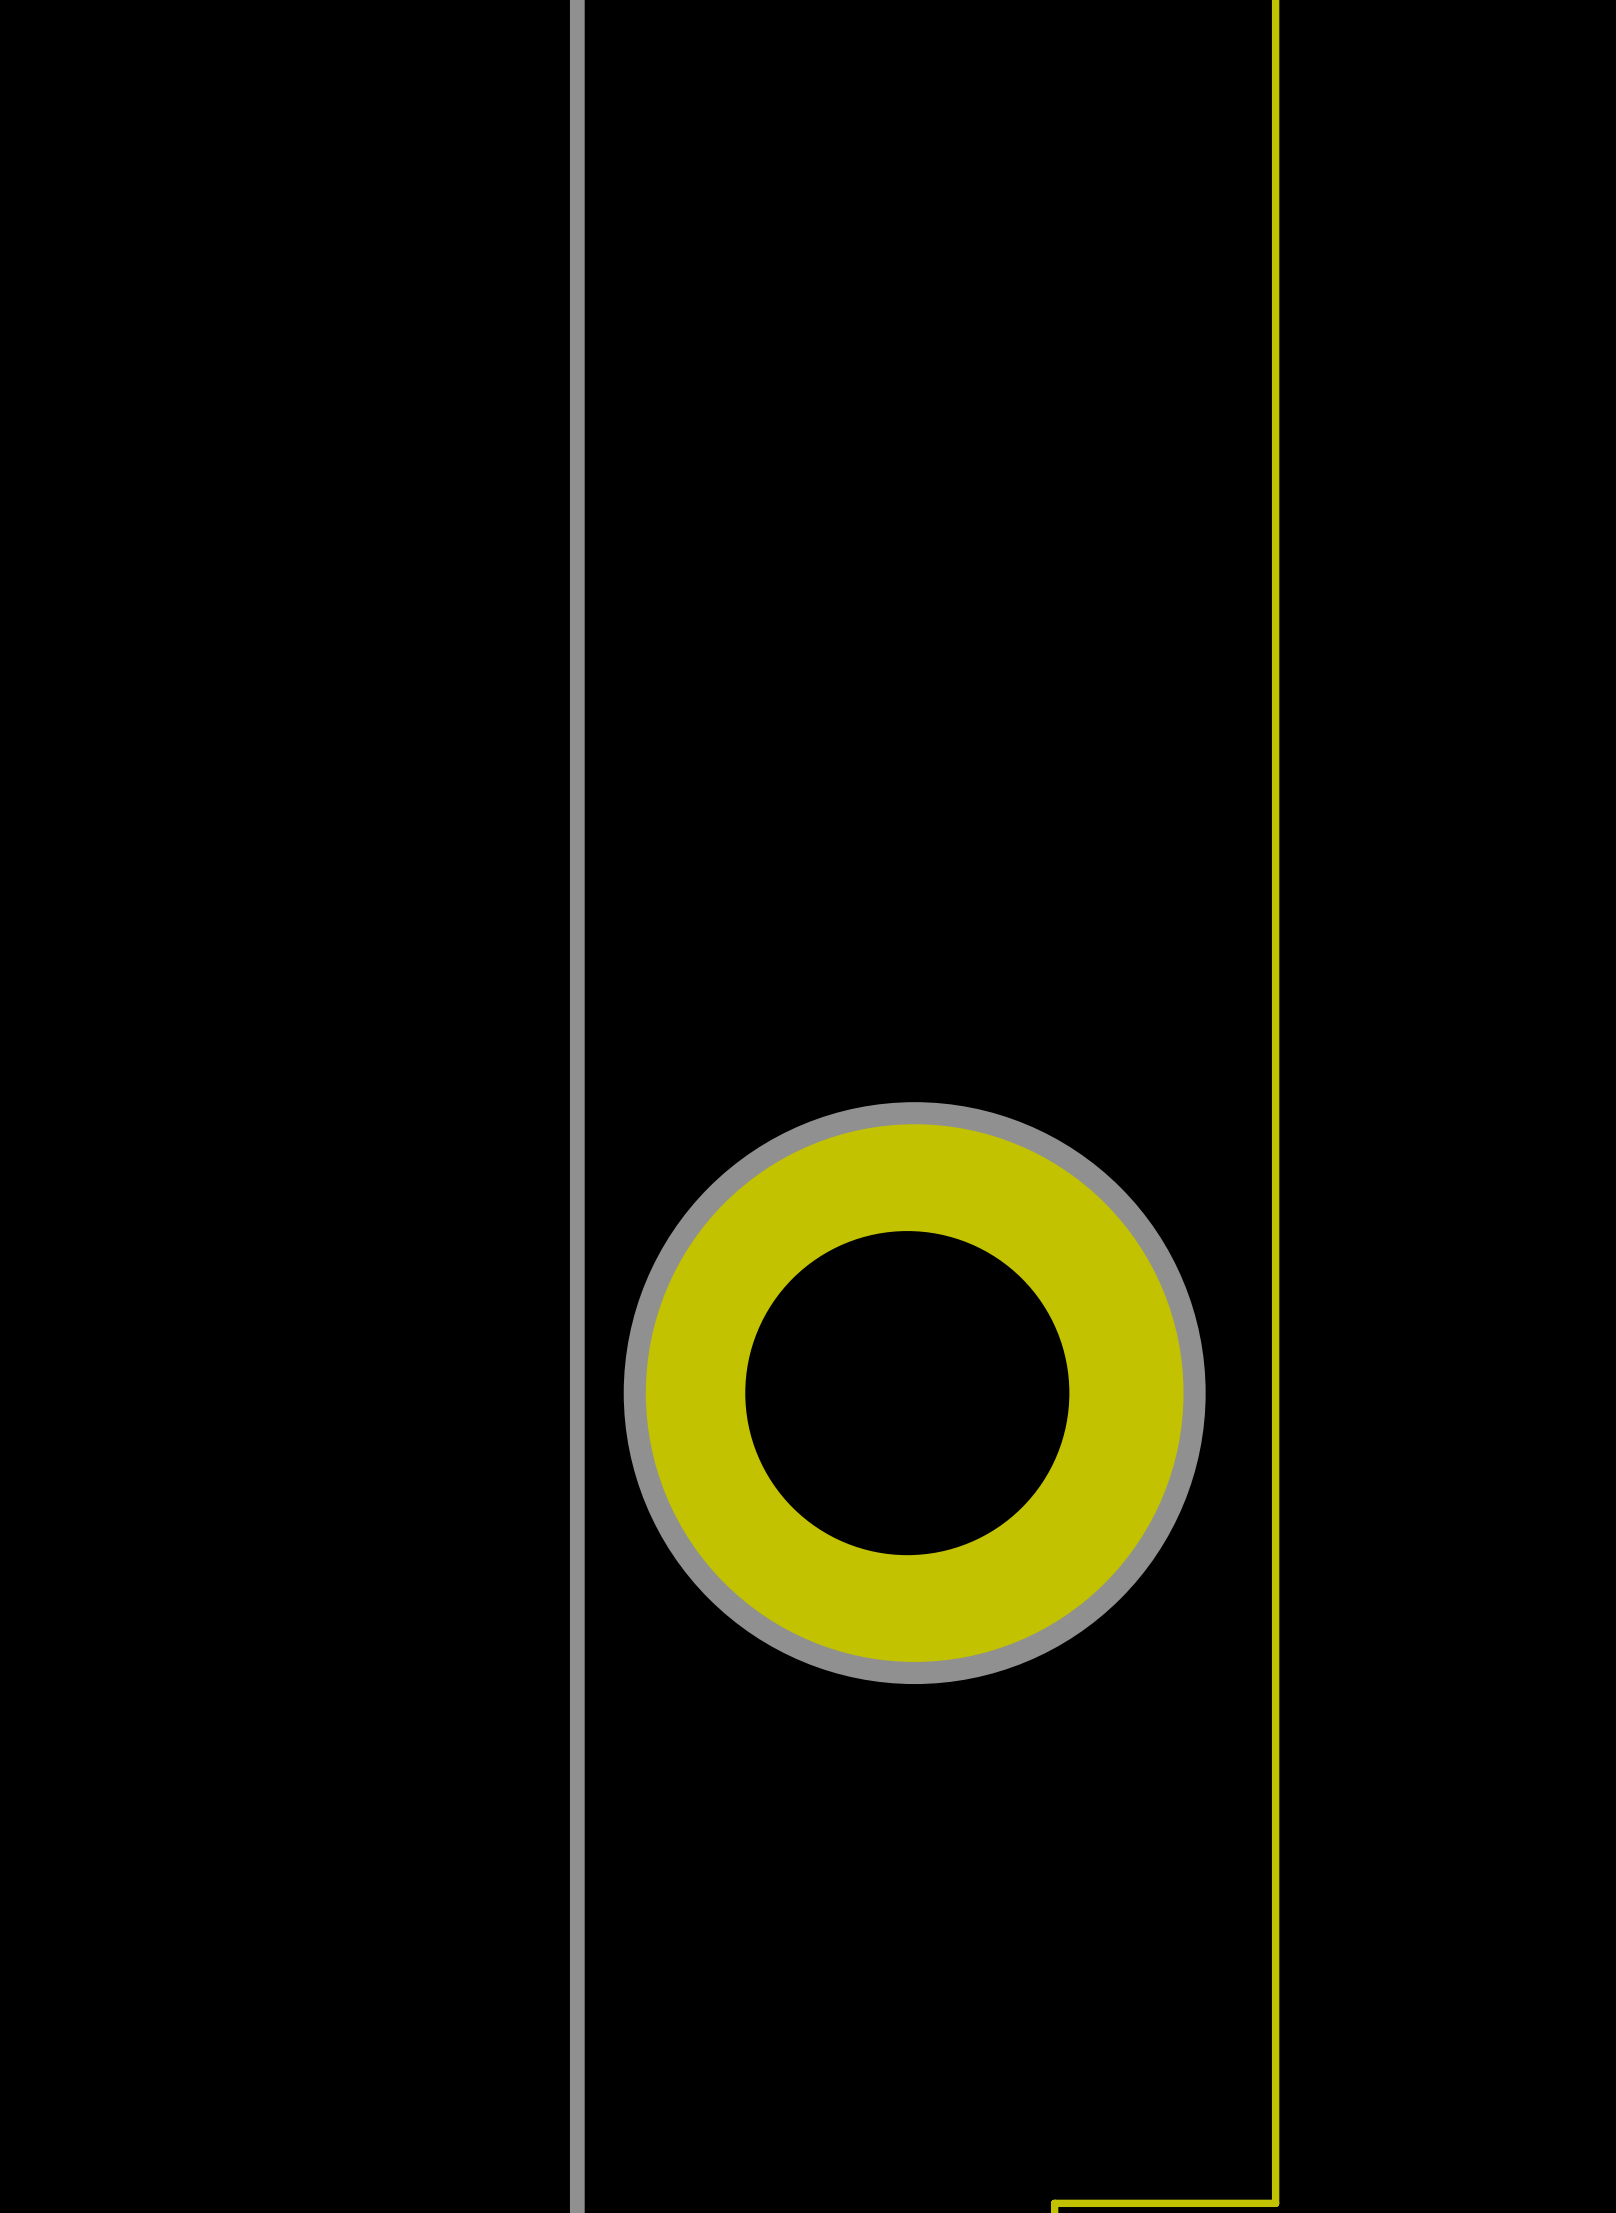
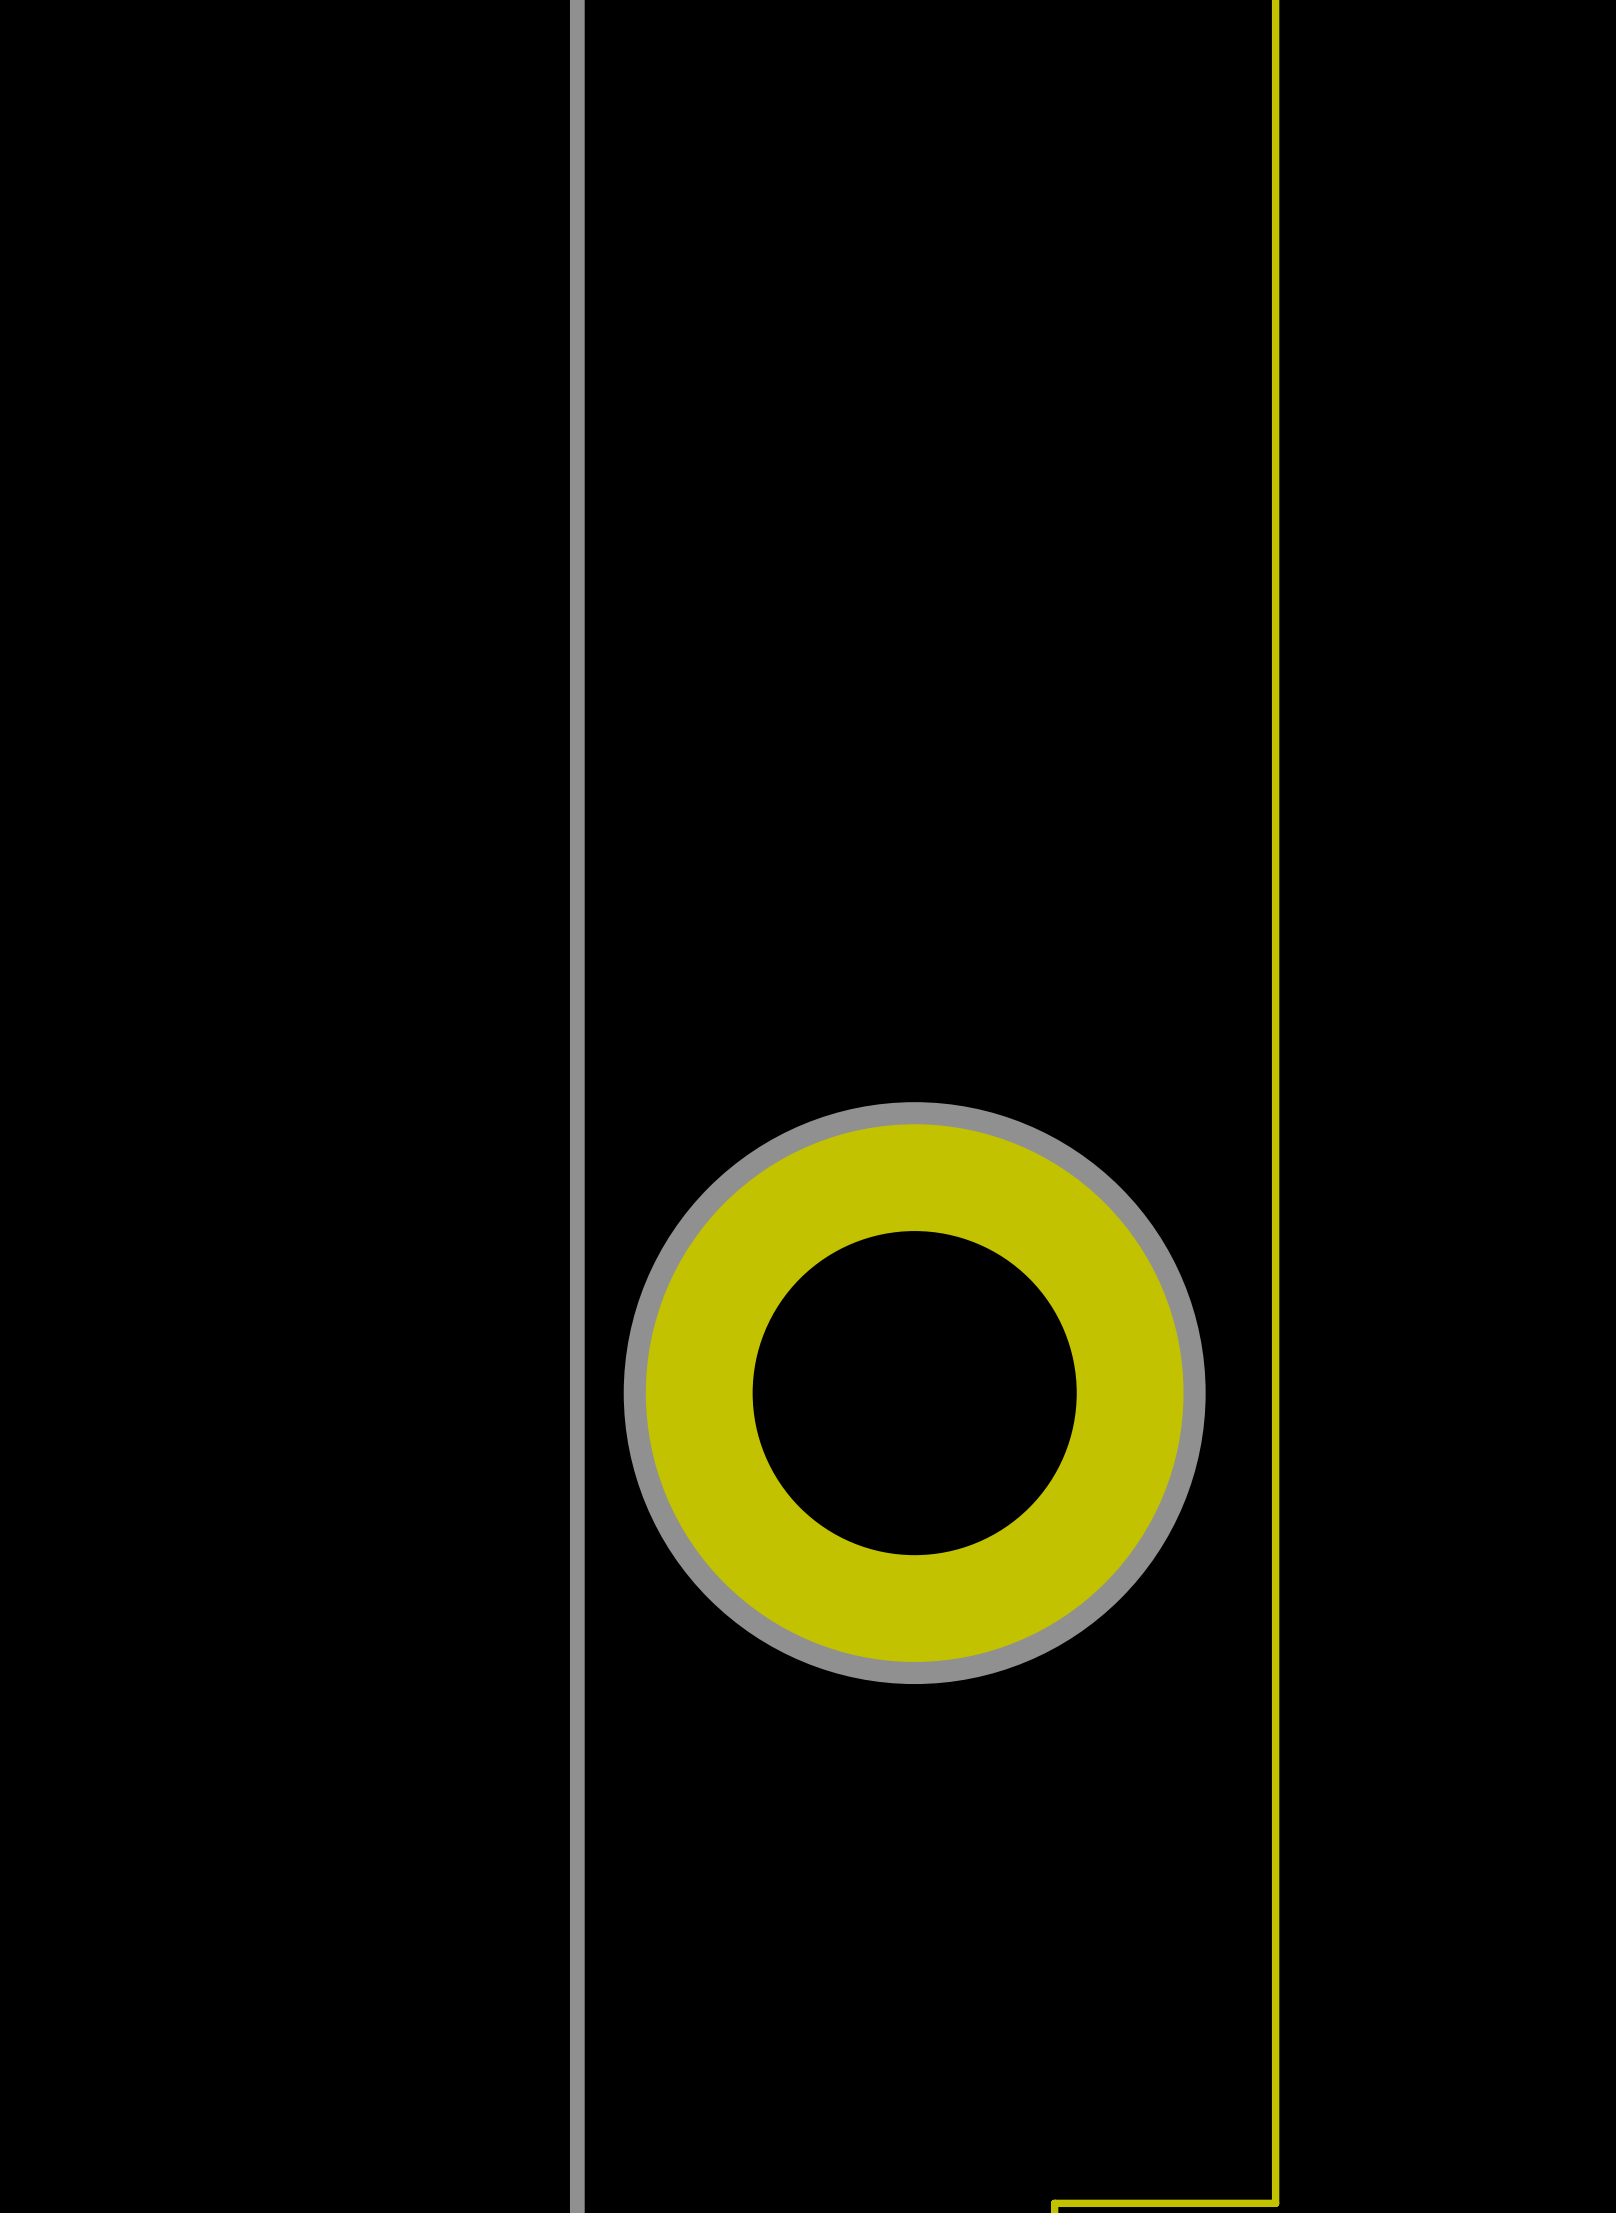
part footprint: [623, 1102, 1206, 1685] -> [623, 1102, 1206, 1685]

